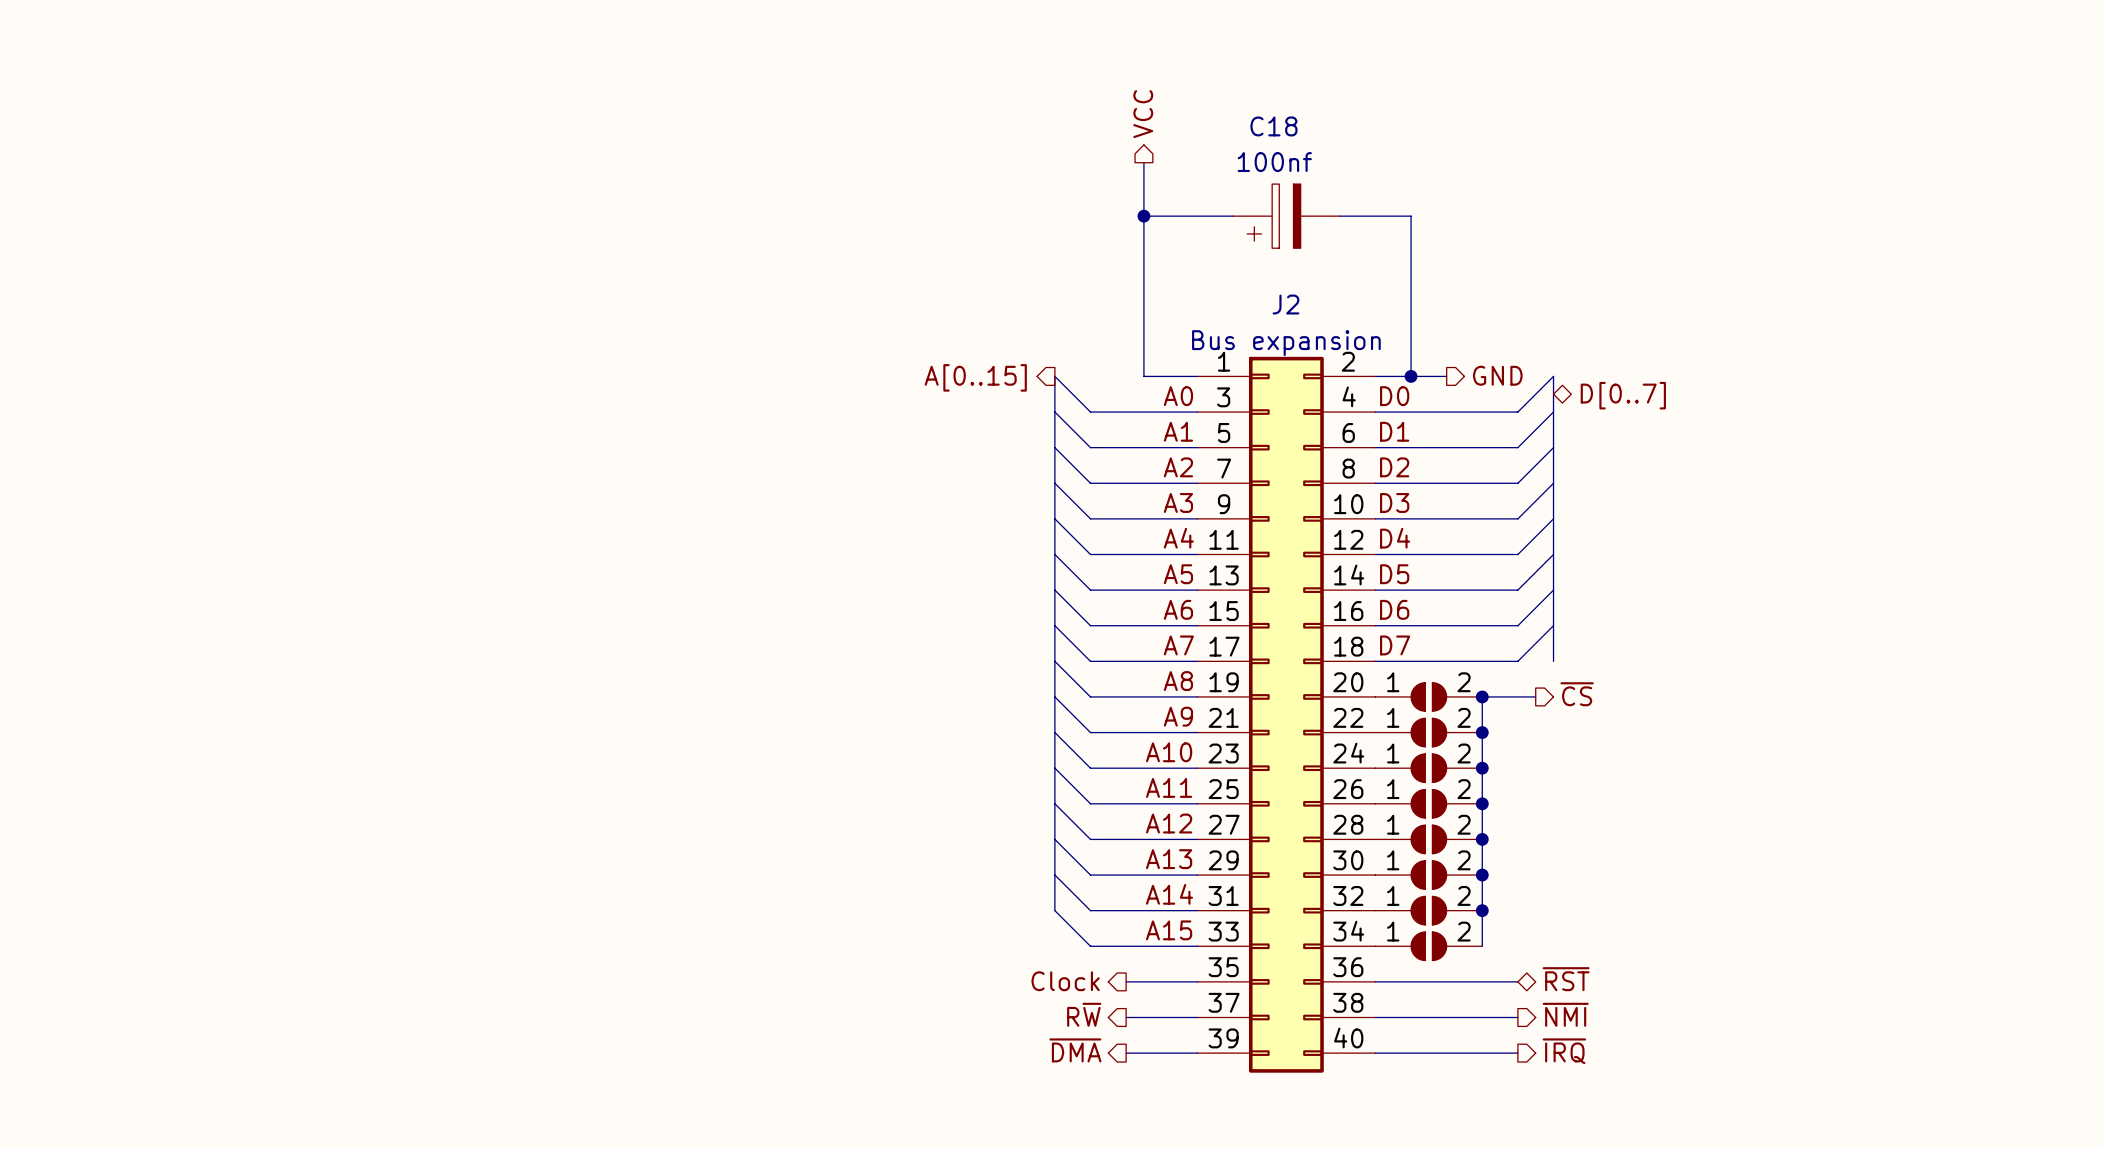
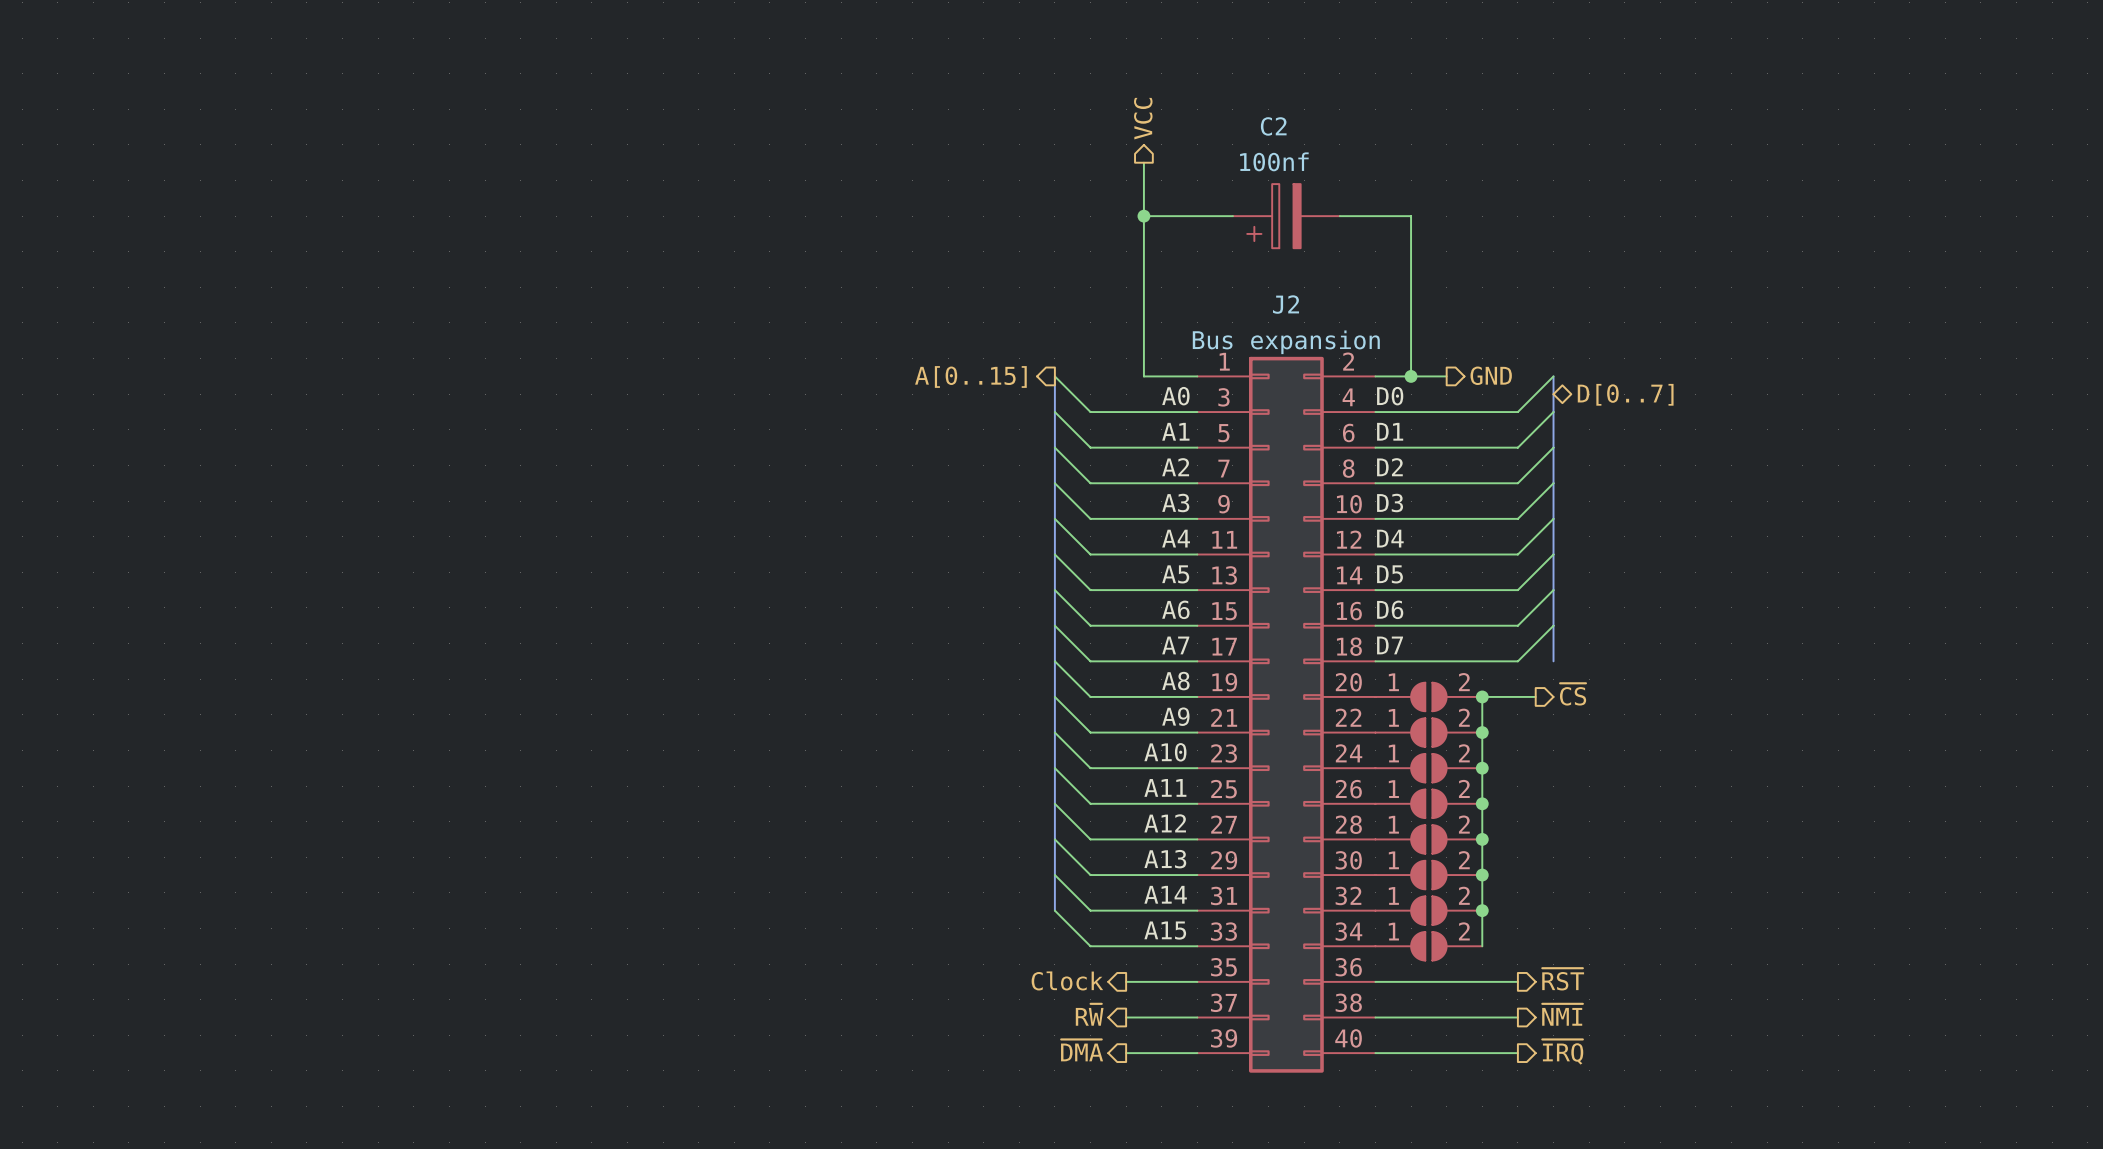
C18 name: C18 (1273, 126) -> C2 (1273, 126)
hierarchical label shape: bidirectional (1566, 979) -> output (1563, 979)

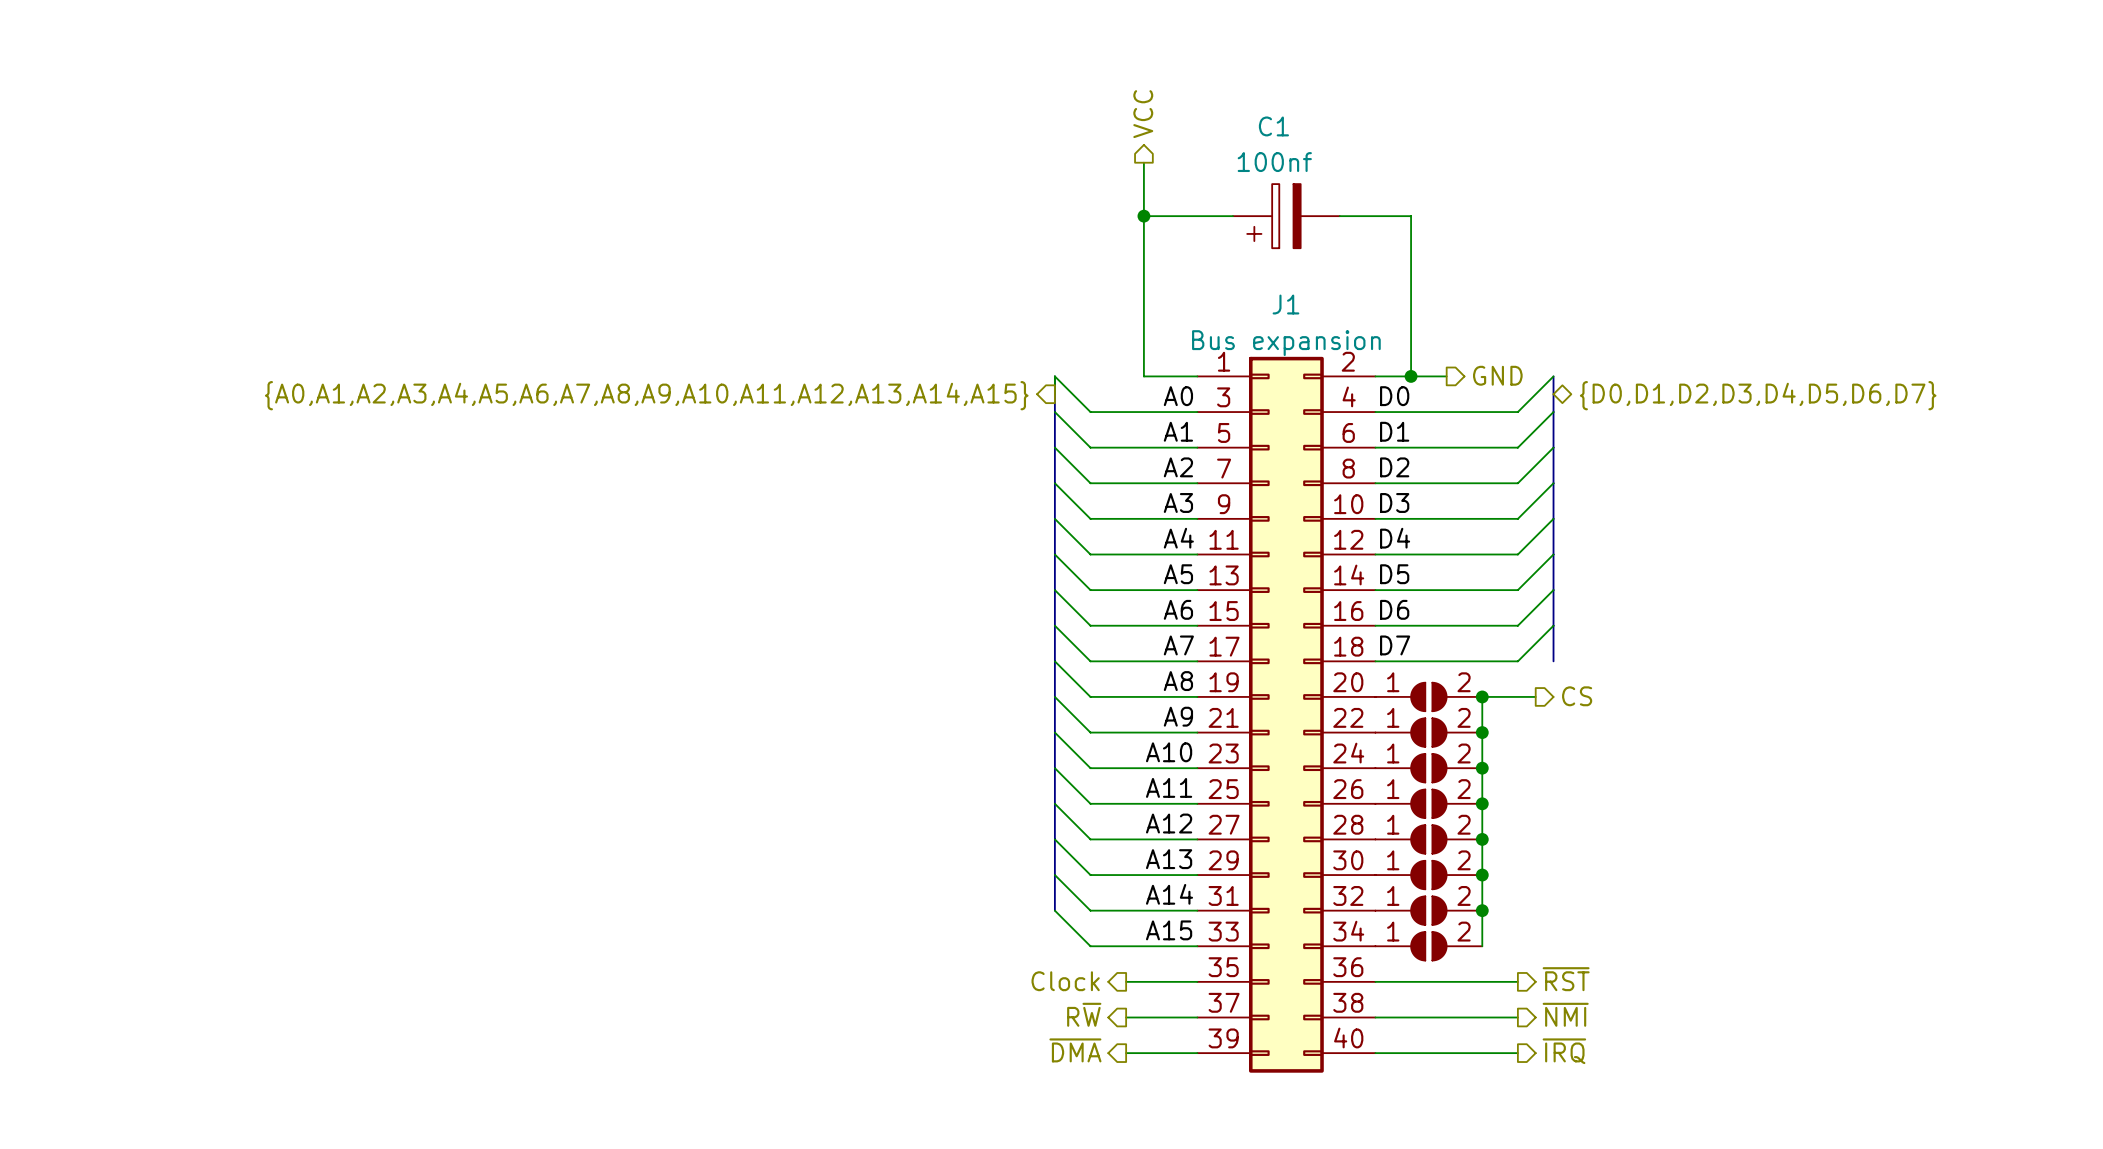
C2 name: C2 (1273, 126) -> C1 (1273, 126)
J2 name: J2 (1286, 304) -> J1 (1285, 304)
hierarchical label: A[0..15] (970, 376) -> none
hierarchical label: D[0..7] (1625, 394) -> {D0,D1,D2,D3,D4,D5,D6,D7} (1758, 395)
hierarchical label: none -> {A0,A1,A2,A3,A4,A5,A6,A7,A8,A9,A10,A11,A12,A13,A14,A15} (646, 395)
hierarchical label: ~{CS} (1573, 694) -> CS (1577, 696)

